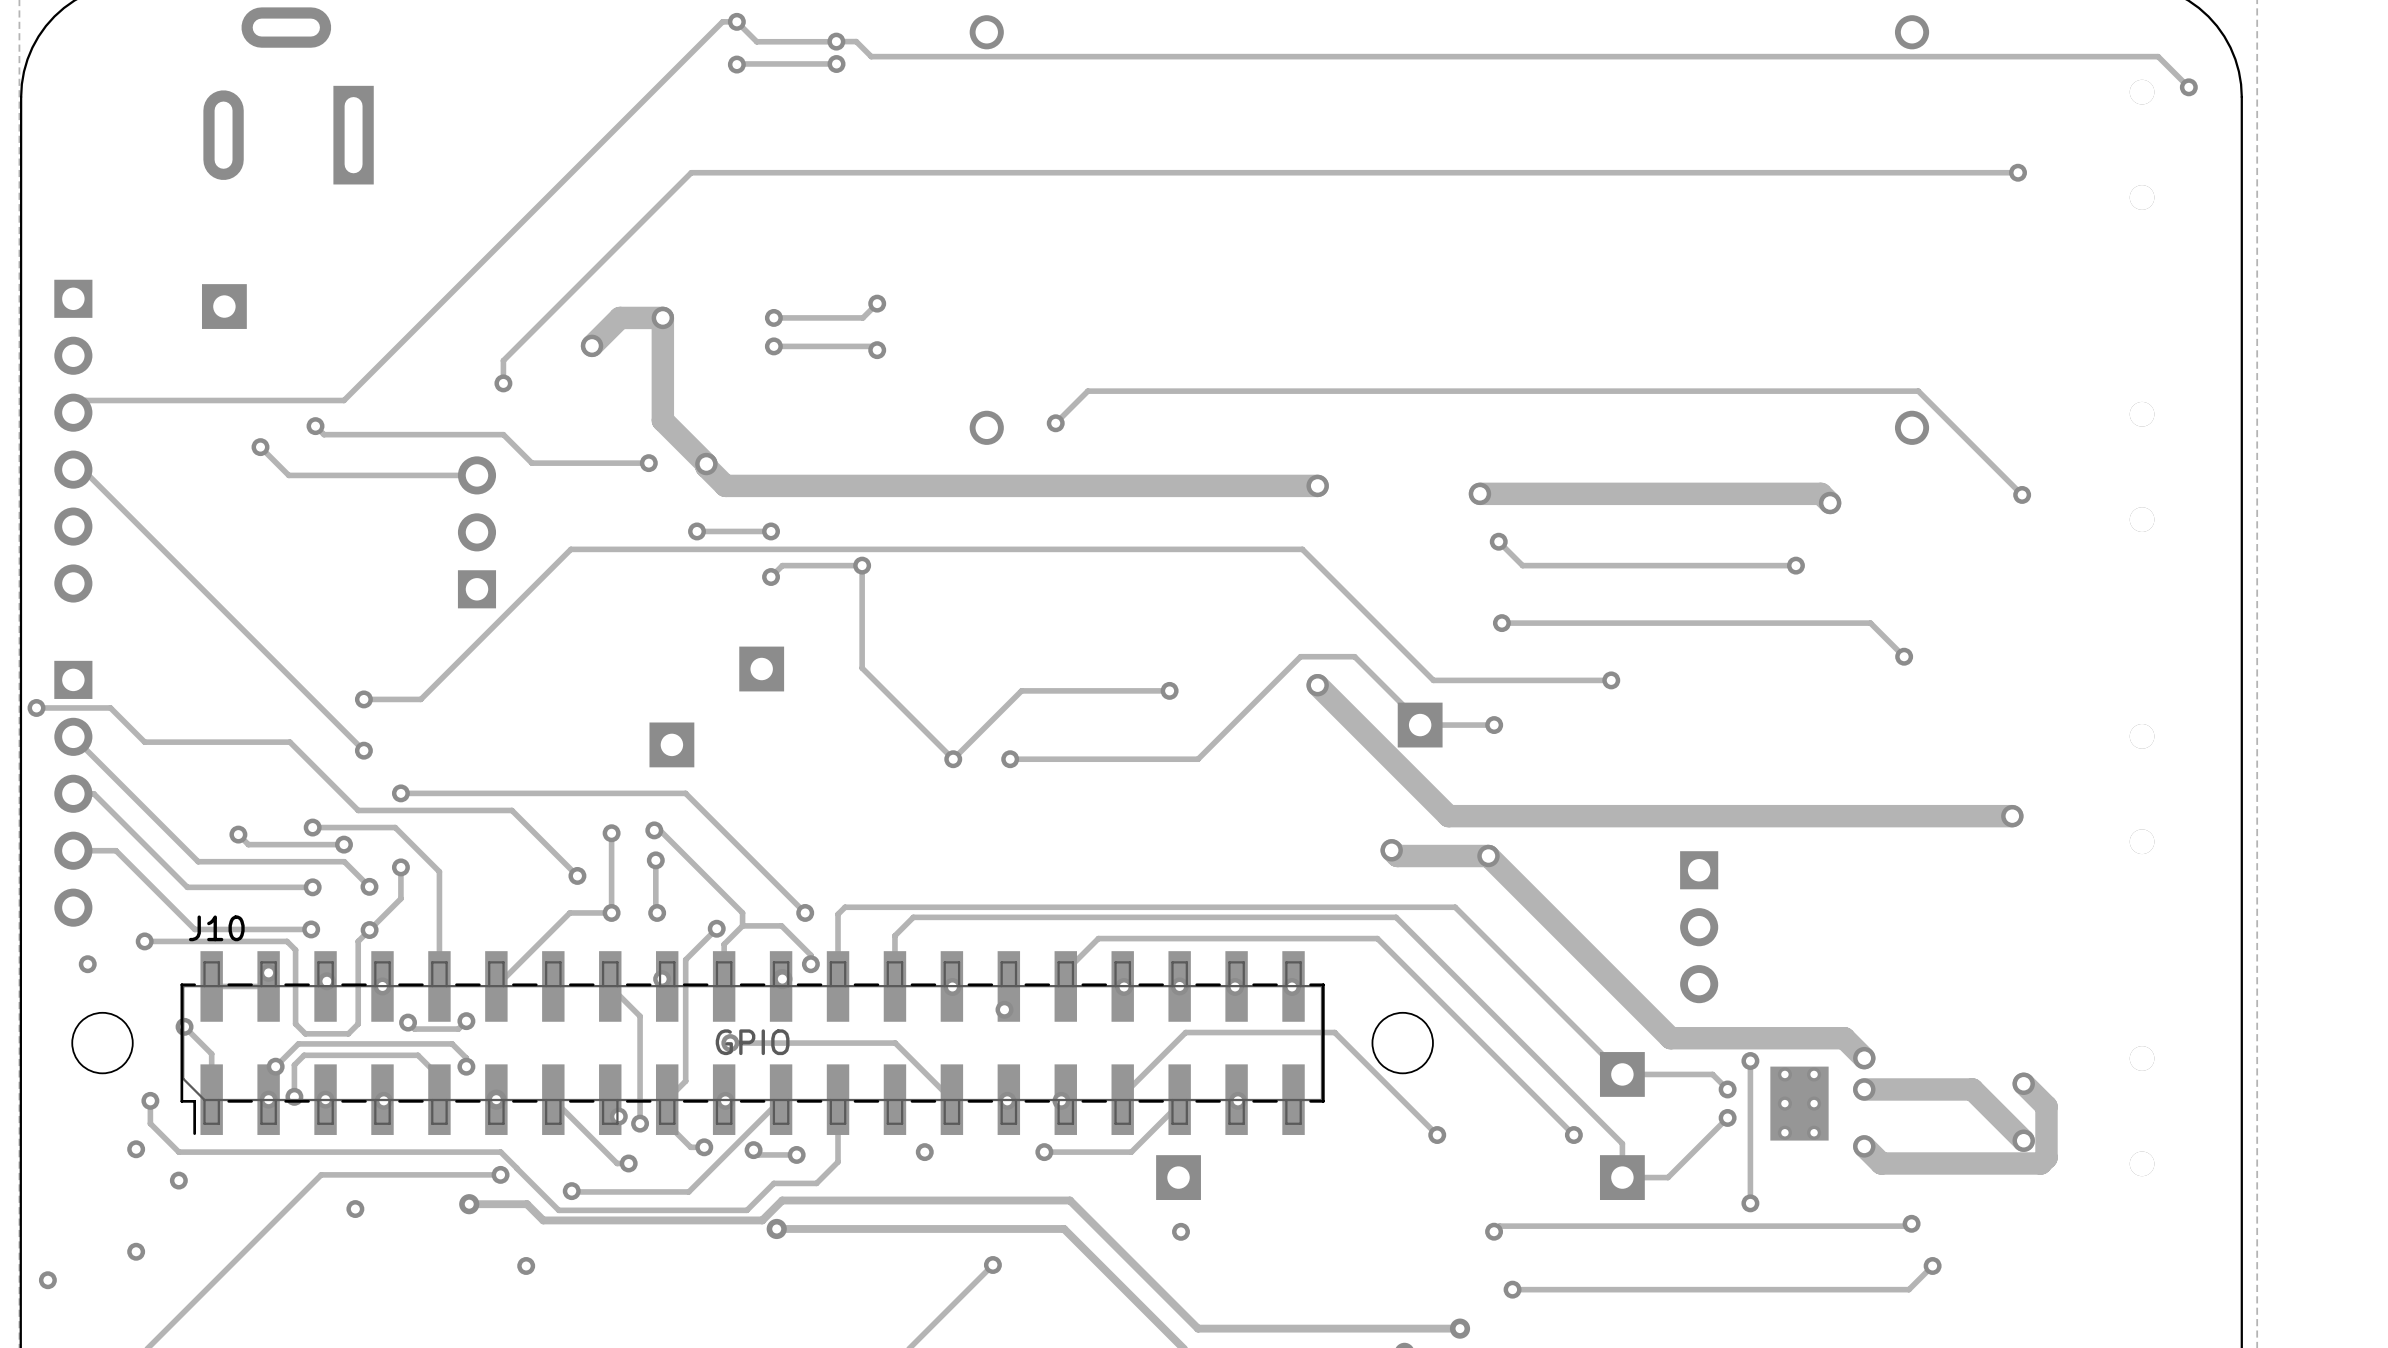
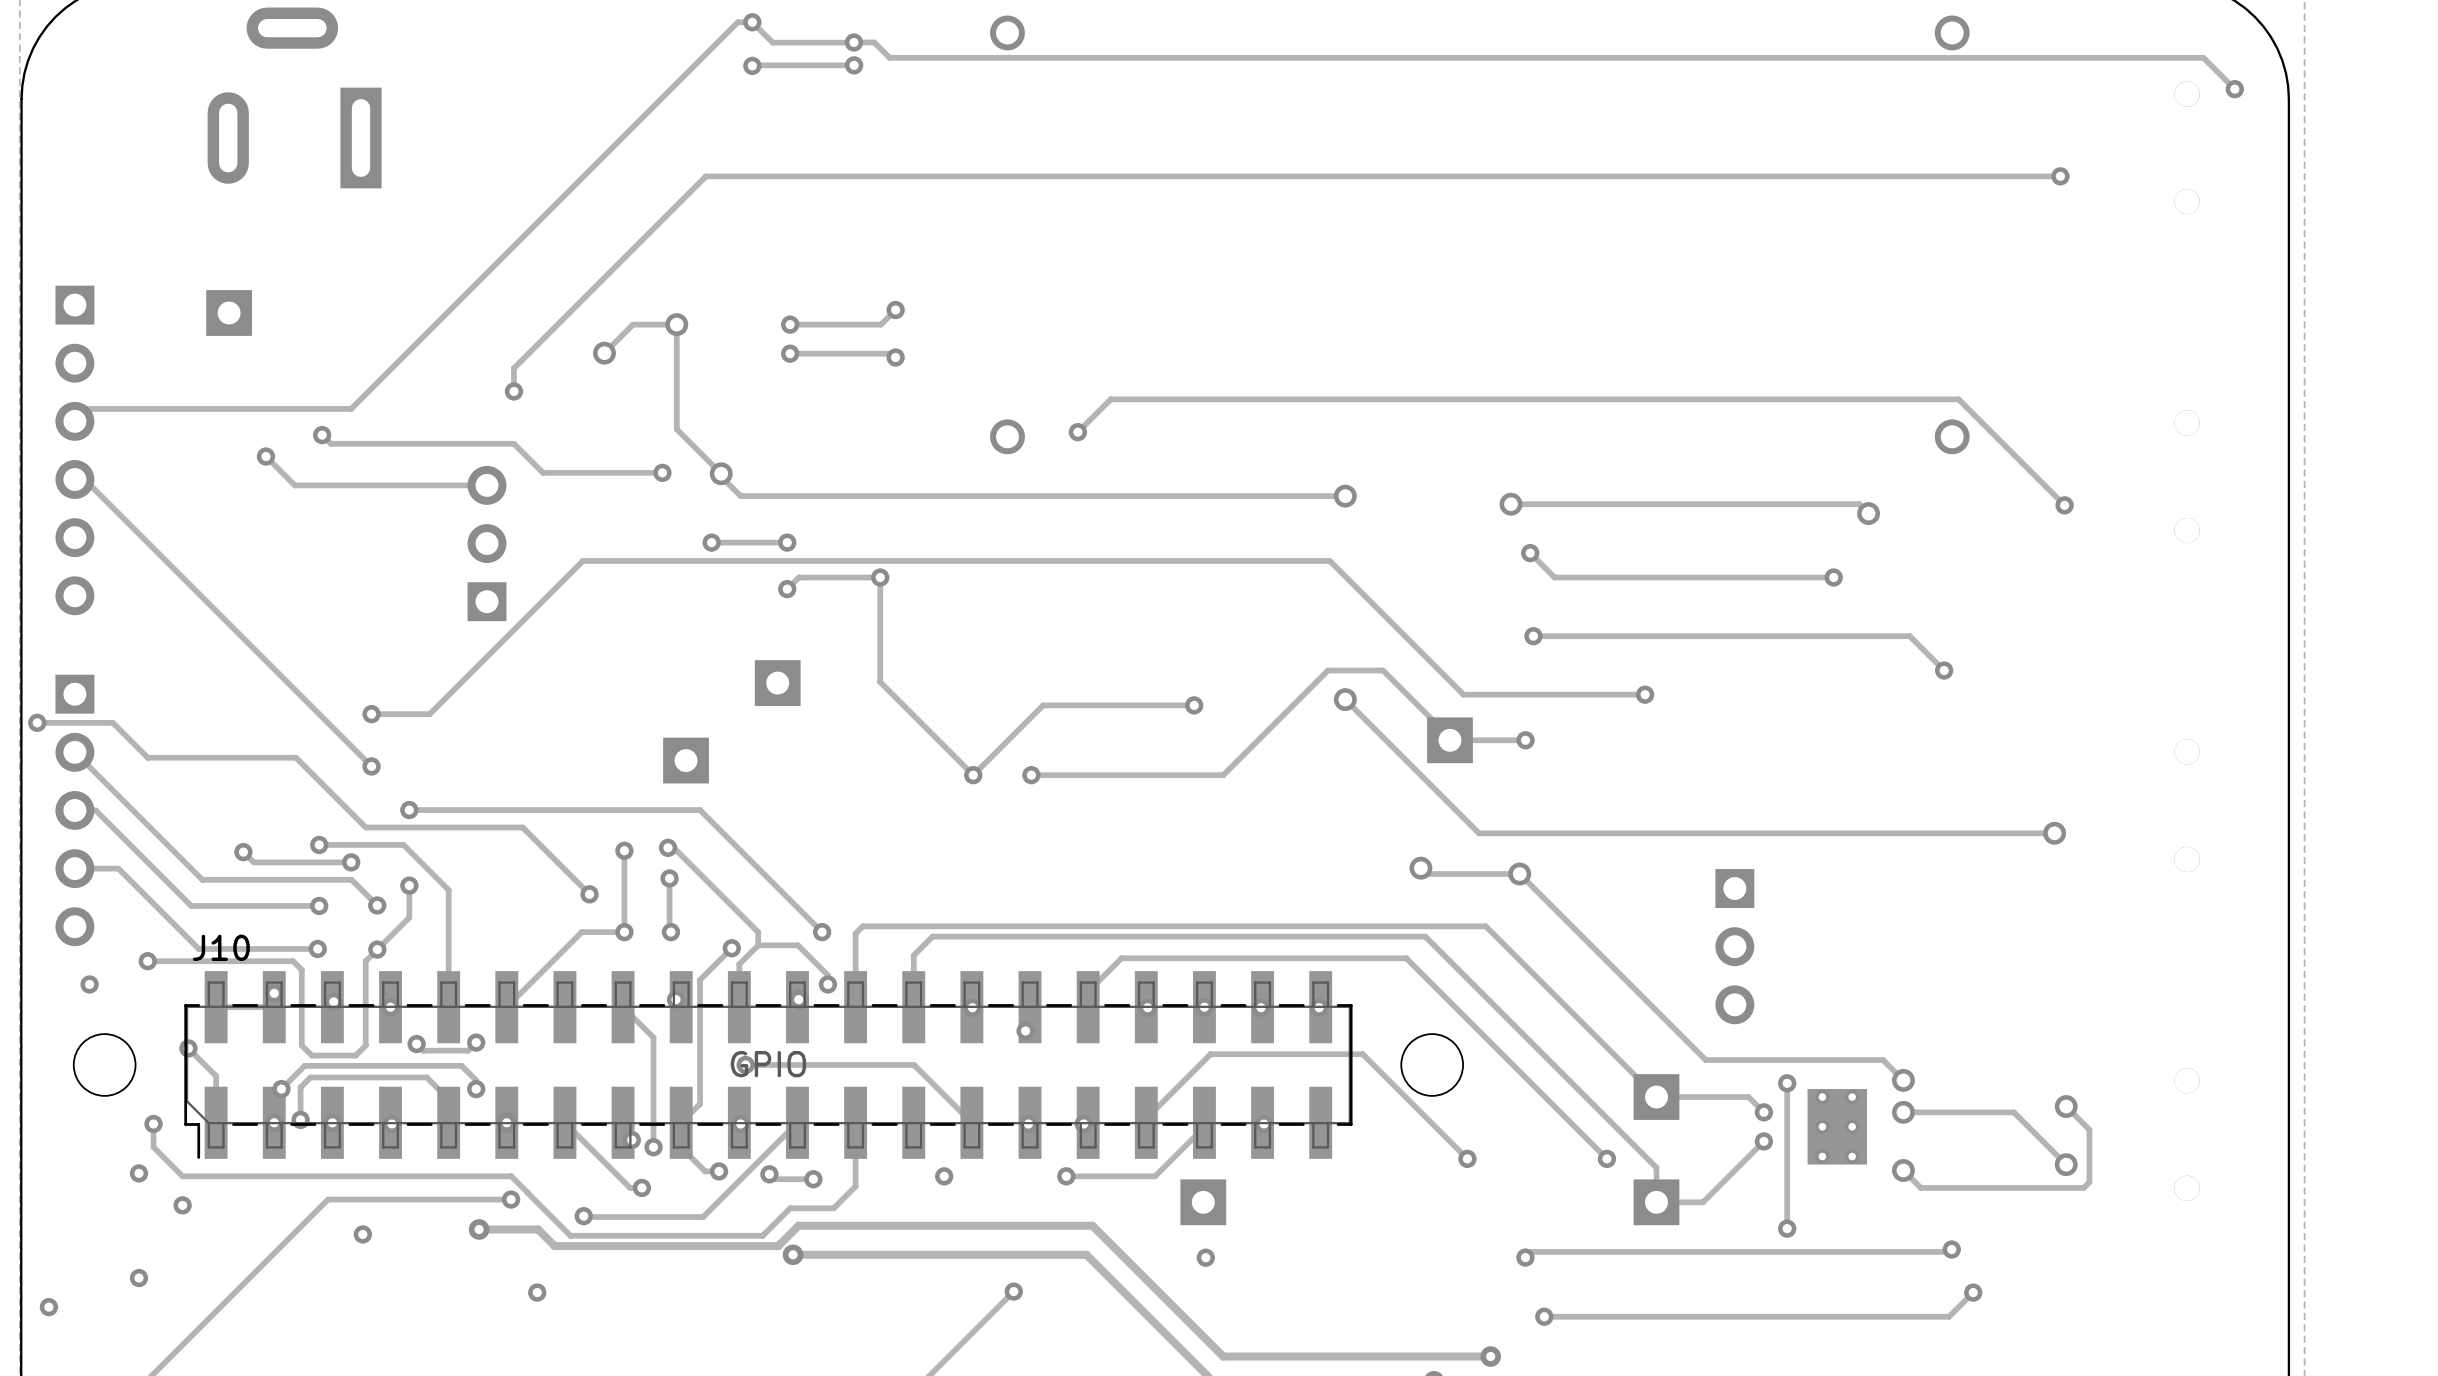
track width: thick (592, 345) (620, 317) (662, 317) (662, 420) (725, 485) (1317, 485) -> thin (604, 353) (633, 324) (676, 324) (676, 429) (740, 496) (1345, 496)
track width: thick (1479, 493) (1820, 493) (1830, 502) -> thin (1511, 504) (1859, 504) (1868, 513)
track width: thick (1317, 685) (1448, 816) (2012, 816) -> thin (1345, 699) (1479, 833) (2054, 833)
track width: thick (1391, 850) (1397, 856) (1488, 856) (1670, 1038) (1844, 1038) (1864, 1058) -> thin (1420, 868) (1426, 874) (1519, 874) (1705, 1060) (1883, 1060) (1903, 1080)
track width: thick (2023, 1083) (2046, 1106) (2046, 1157) (2040, 1163) (1881, 1163) (1864, 1146) -> thin (2066, 1106) (2089, 1129) (2089, 1182) (2083, 1187) (1920, 1187) (1903, 1170)
track width: thick (1864, 1089) (1972, 1089) (2023, 1140) -> thin (1903, 1112) (2013, 1112) (2066, 1164)

